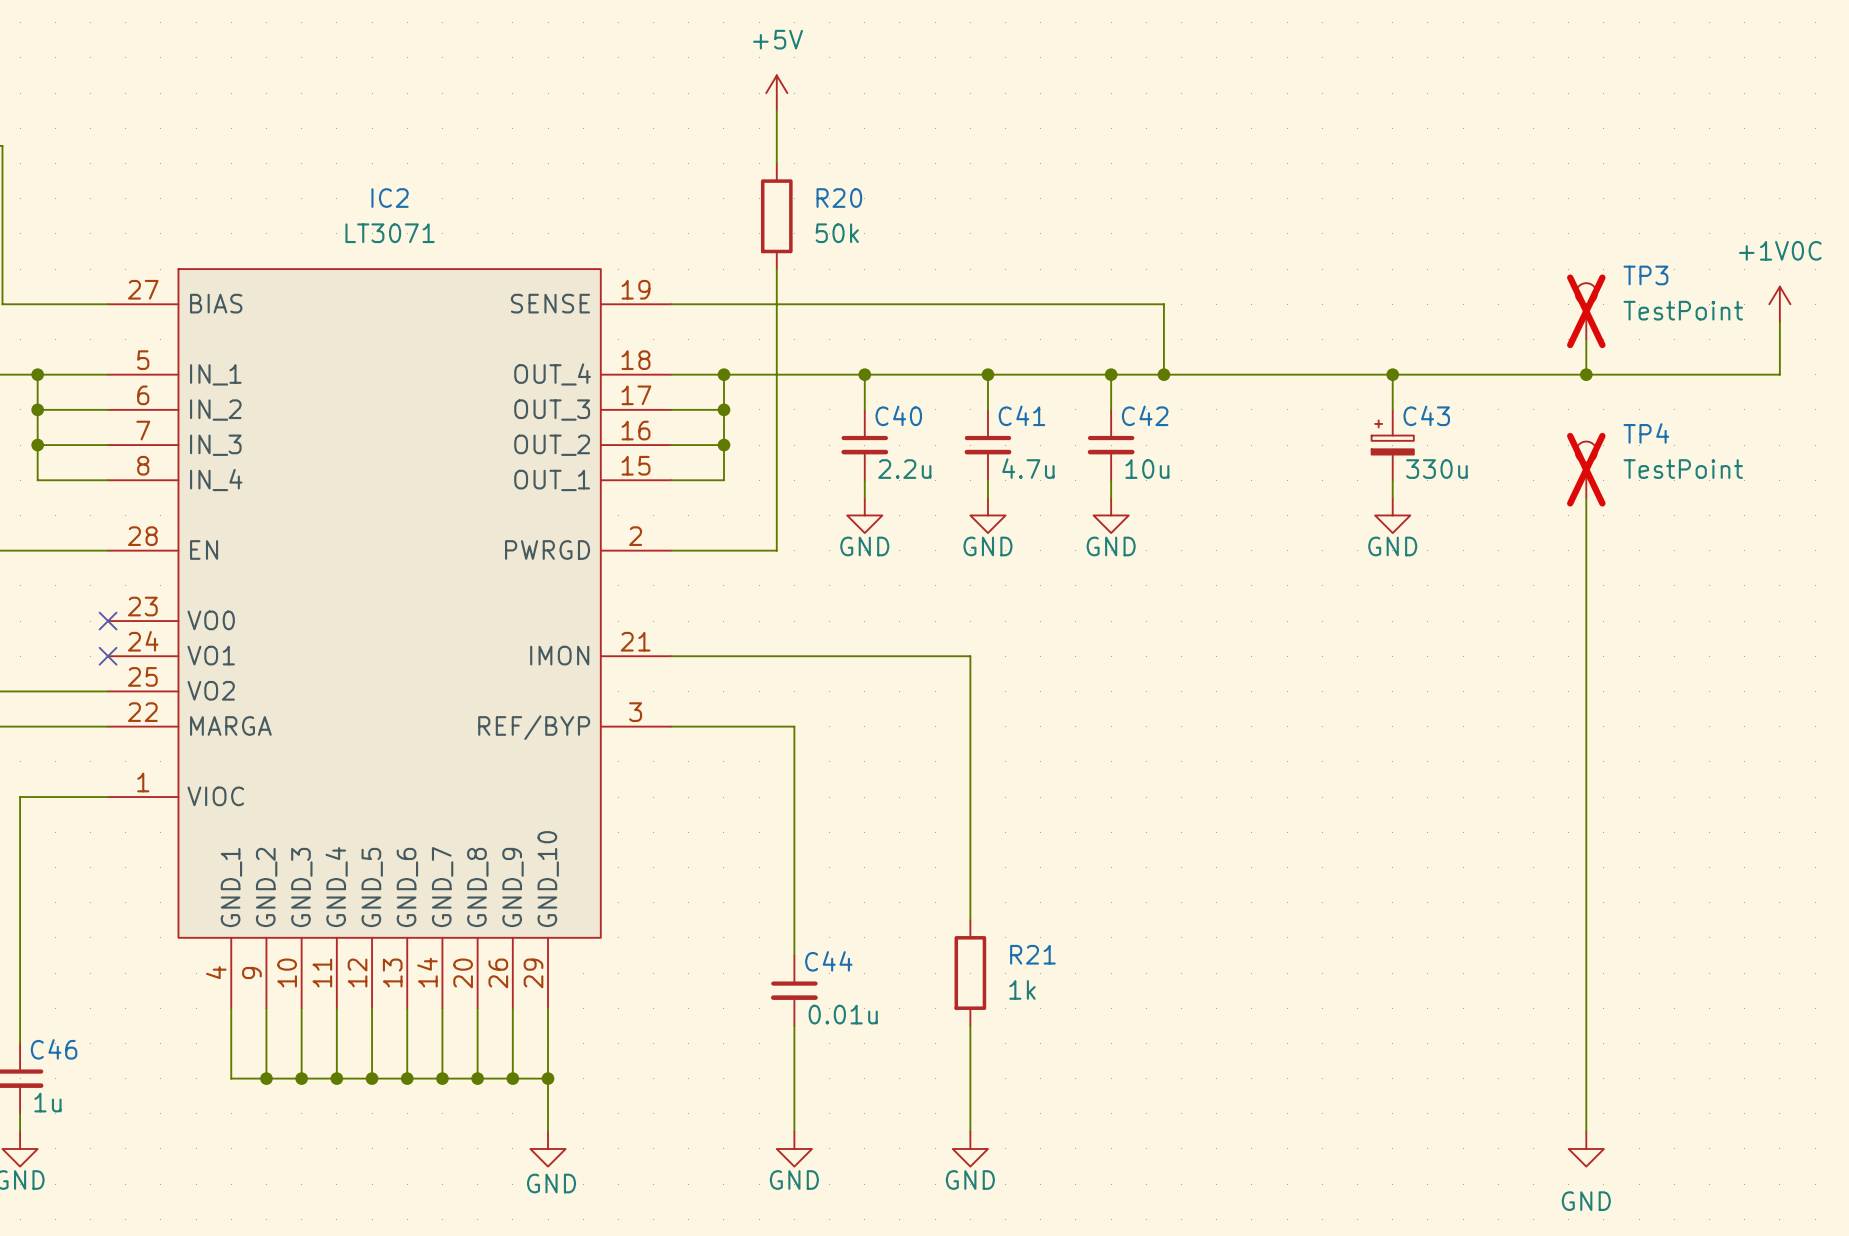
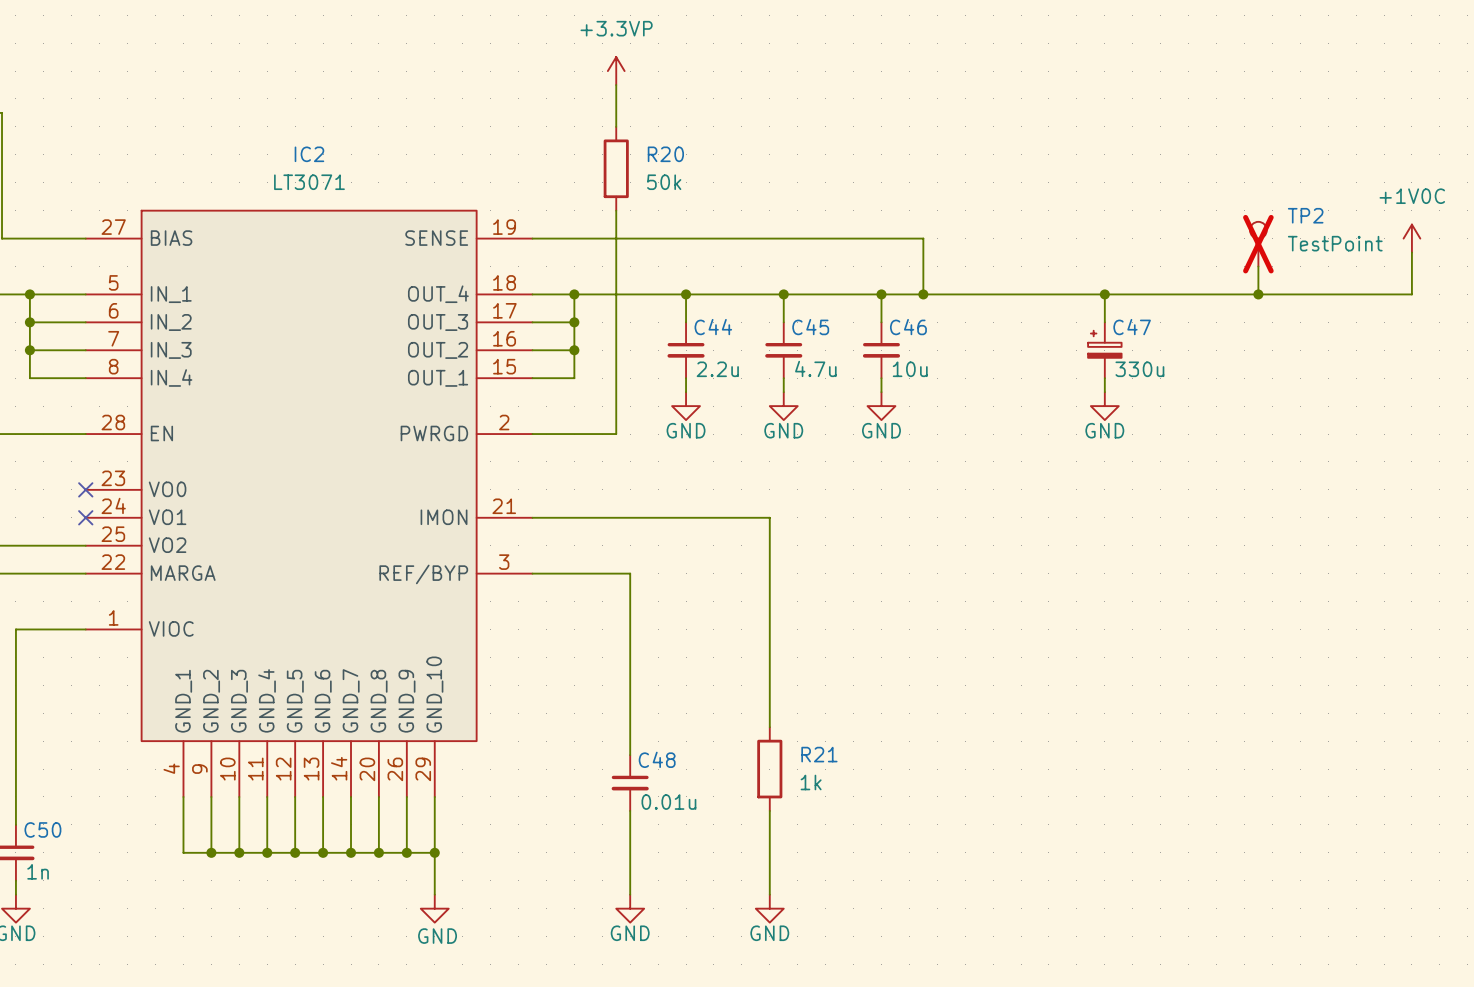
power symbol: +5V (776, 93) -> +3.3VP (616, 71)
TP3 name: TP3 (1645, 275) -> TP2 (1305, 215)
C40 name: C40 (898, 415) -> C44 (713, 327)
C41 name: C41 (1021, 415) -> C45 (810, 327)
C42 name: C42 (1145, 415) -> C46 (908, 327)
C43 name: C43 (1426, 415) -> C47 (1132, 327)
TP4: TestPoint (1586, 469) -> none
wire: (1586, 497) (1586, 1131) -> none
C44 name: C44 (828, 961) -> C48 (657, 759)
C46 name: C46 (54, 1049) -> C50 (42, 829)
C46 value: 1u (47, 1102) -> 1n (38, 871)
power symbol: GND (1586, 1148) -> none

